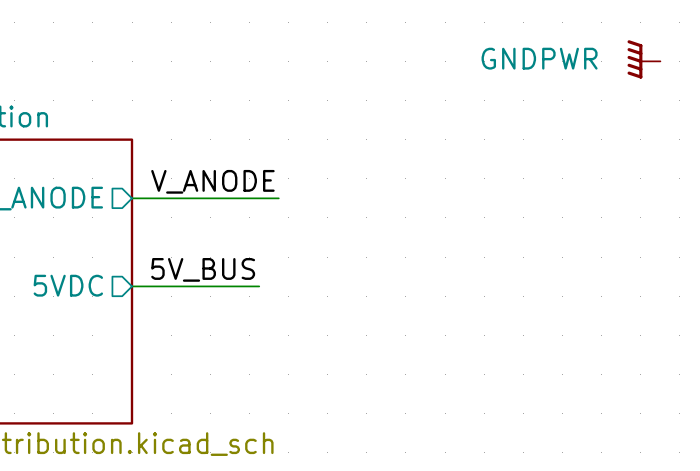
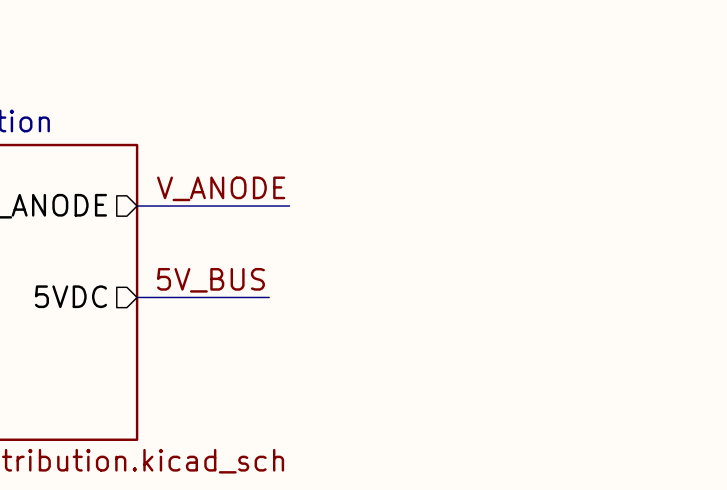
power symbol: GNDPWR (643, 59) -> none

